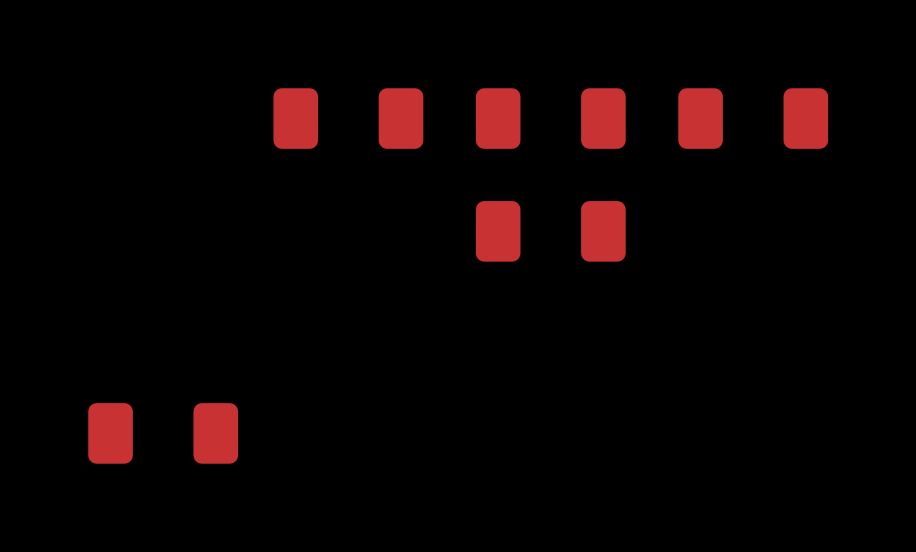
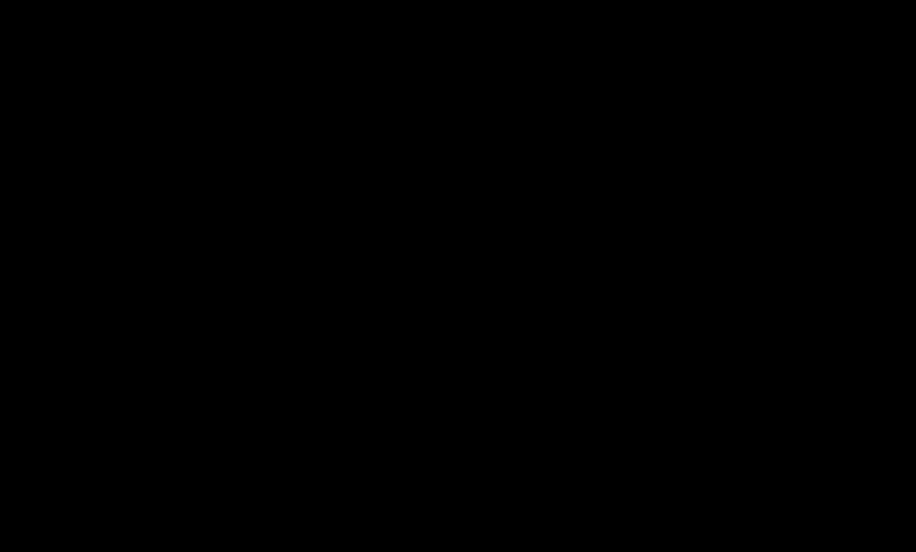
part: (348, 118) -> none
part: (550, 118) -> none
part: (753, 118) -> none
part: (550, 231) -> none
part: (163, 433) -> none

